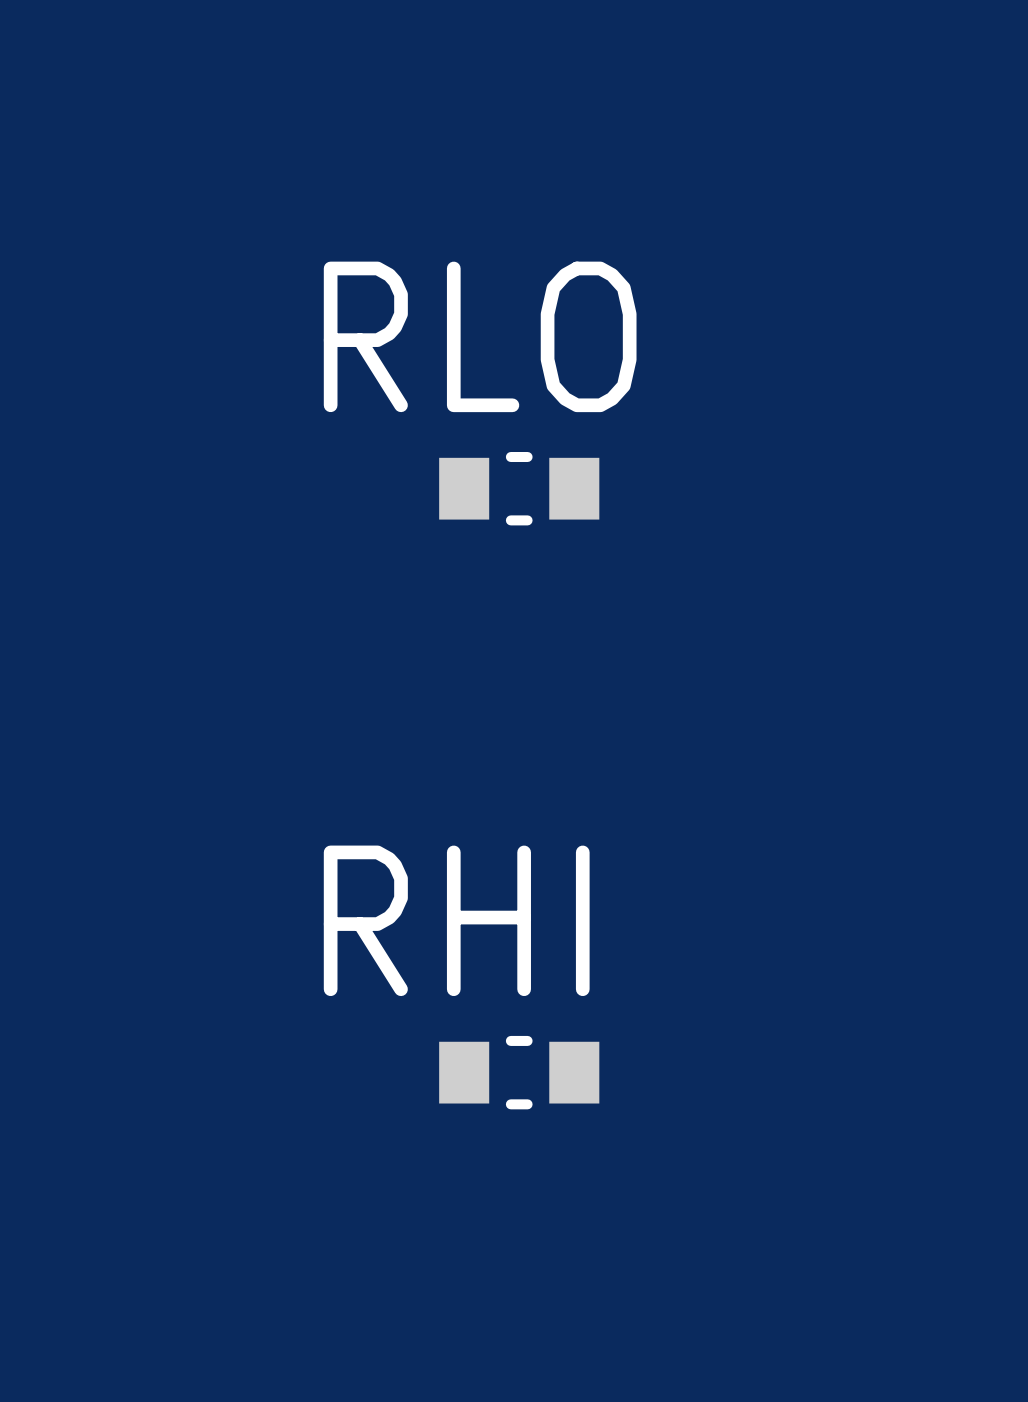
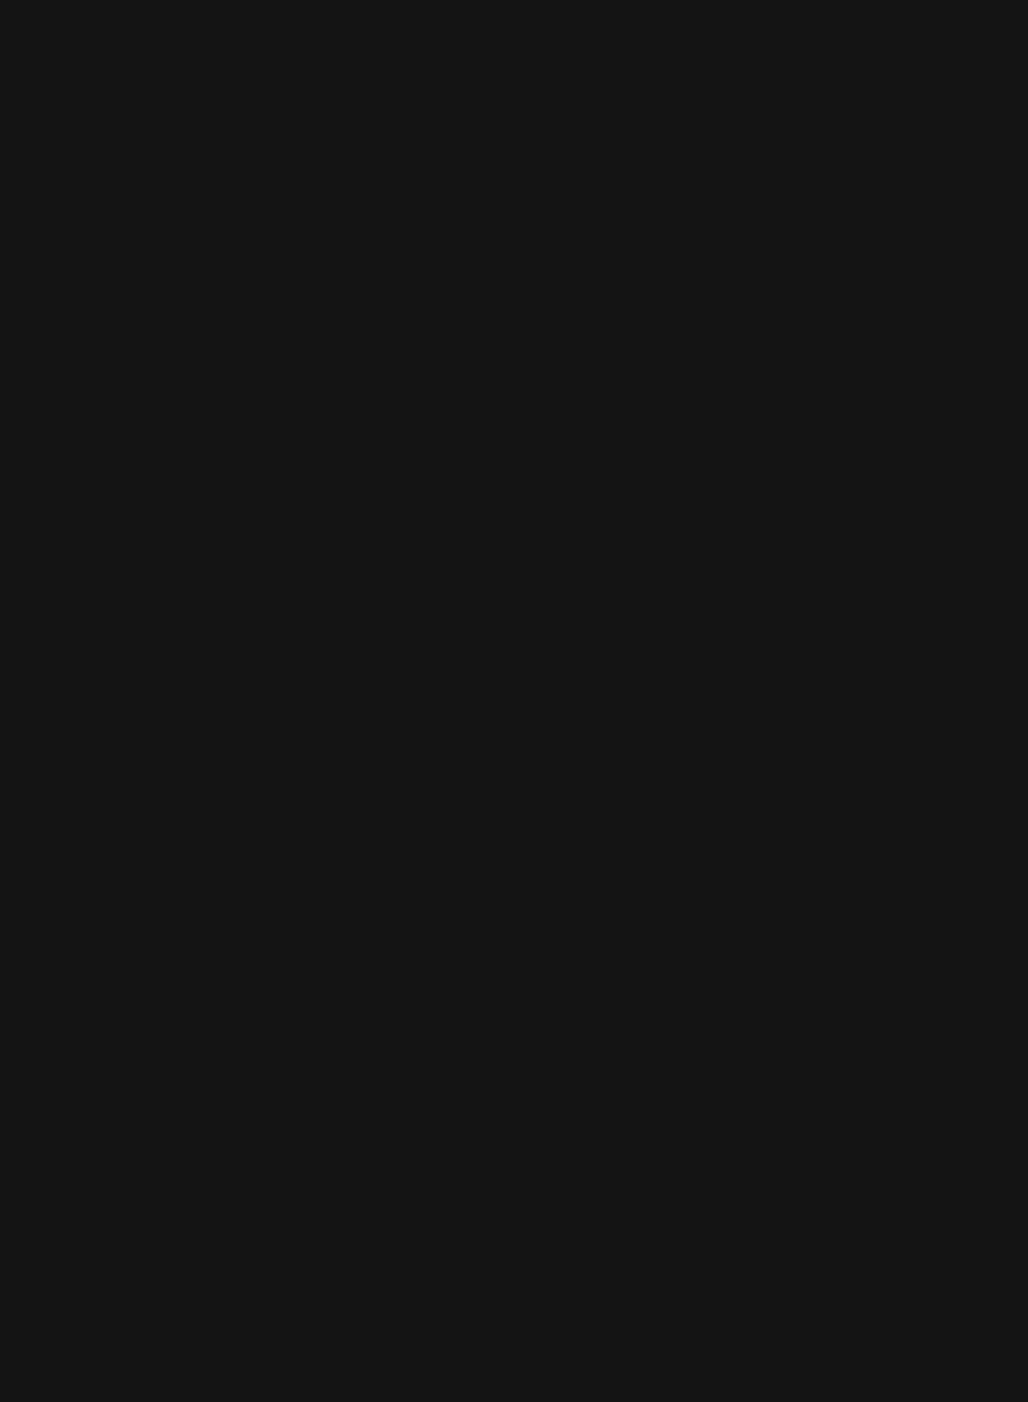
RLO: (519, 488) -> none
RHI: (519, 1072) -> none

